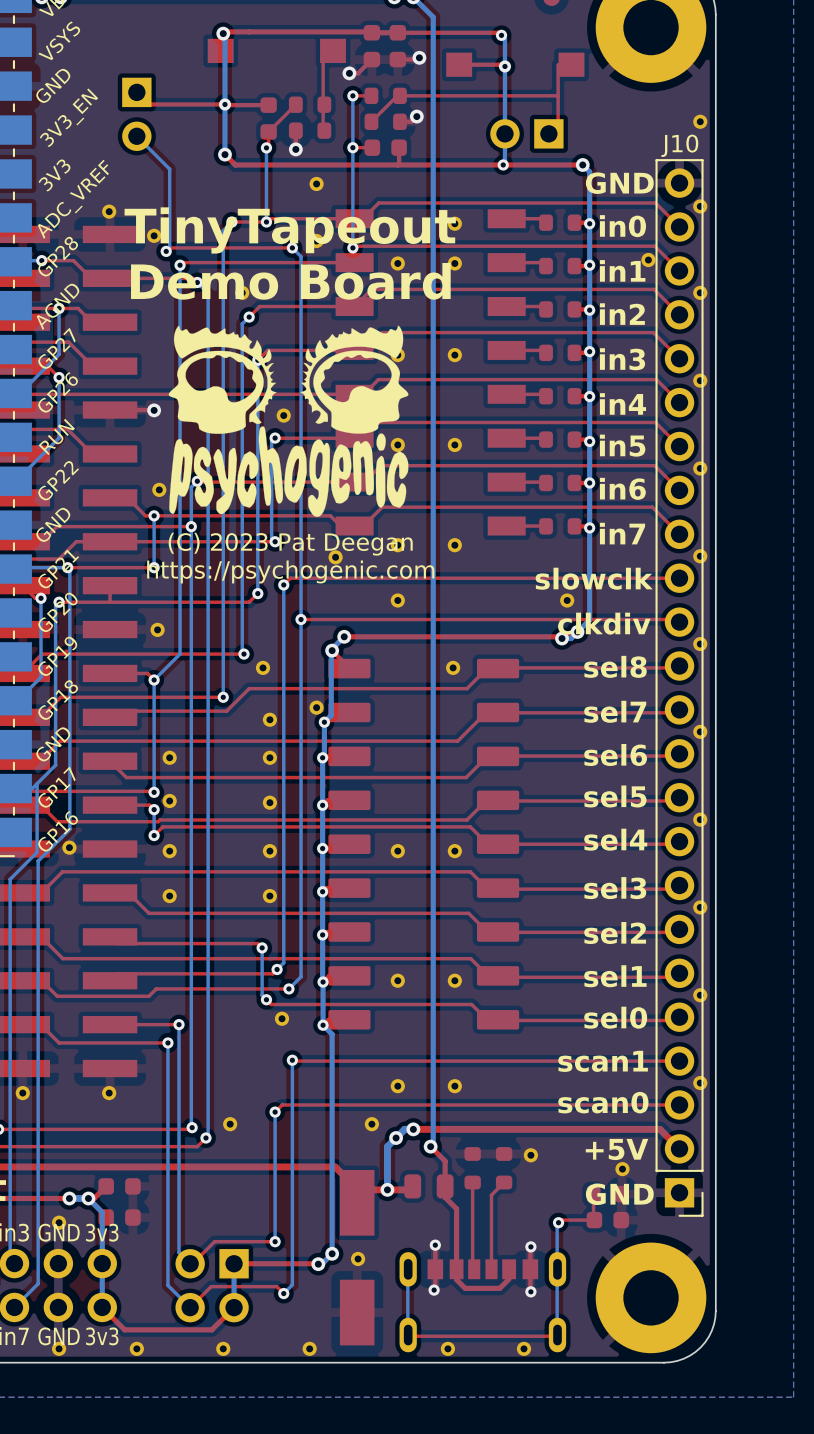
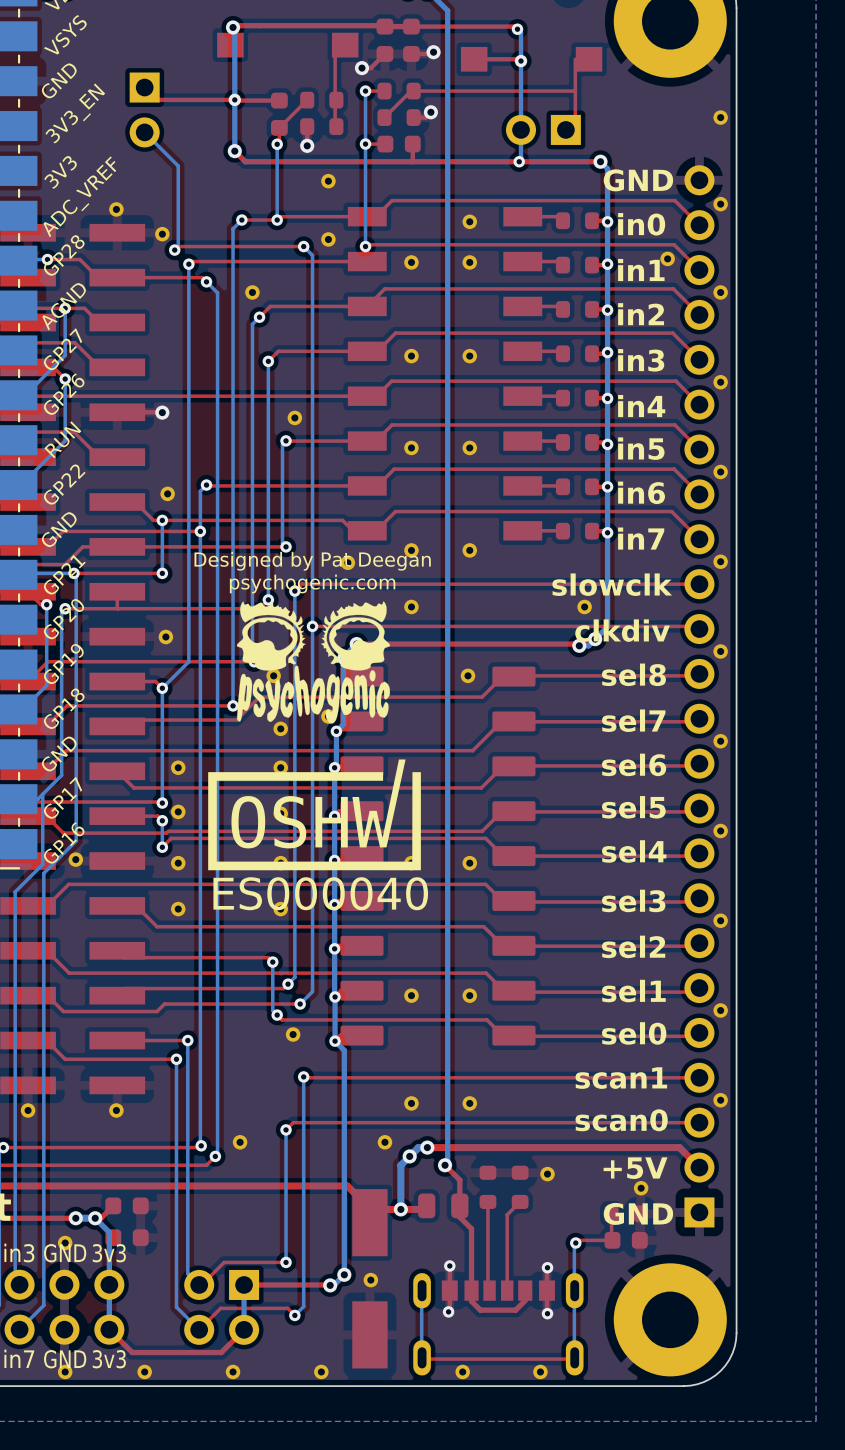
text: TinyTapeout (290, 230) -> none
text: Demo Board (290, 281) -> none
drawing: [168, 325, 409, 517] -> none
text: (C) 2023 Pat Deegan (290, 544) -> none
text: none -> Designed by Pat Deegan (312, 561)
text: https://psychogenic.com (290, 571) -> psychogenic.com (312, 583)
drawing: none -> [236, 601, 390, 724]
J10 side: bottom (679, 687) -> top (699, 696)
drawing: none -> [208, 759, 421, 871]

